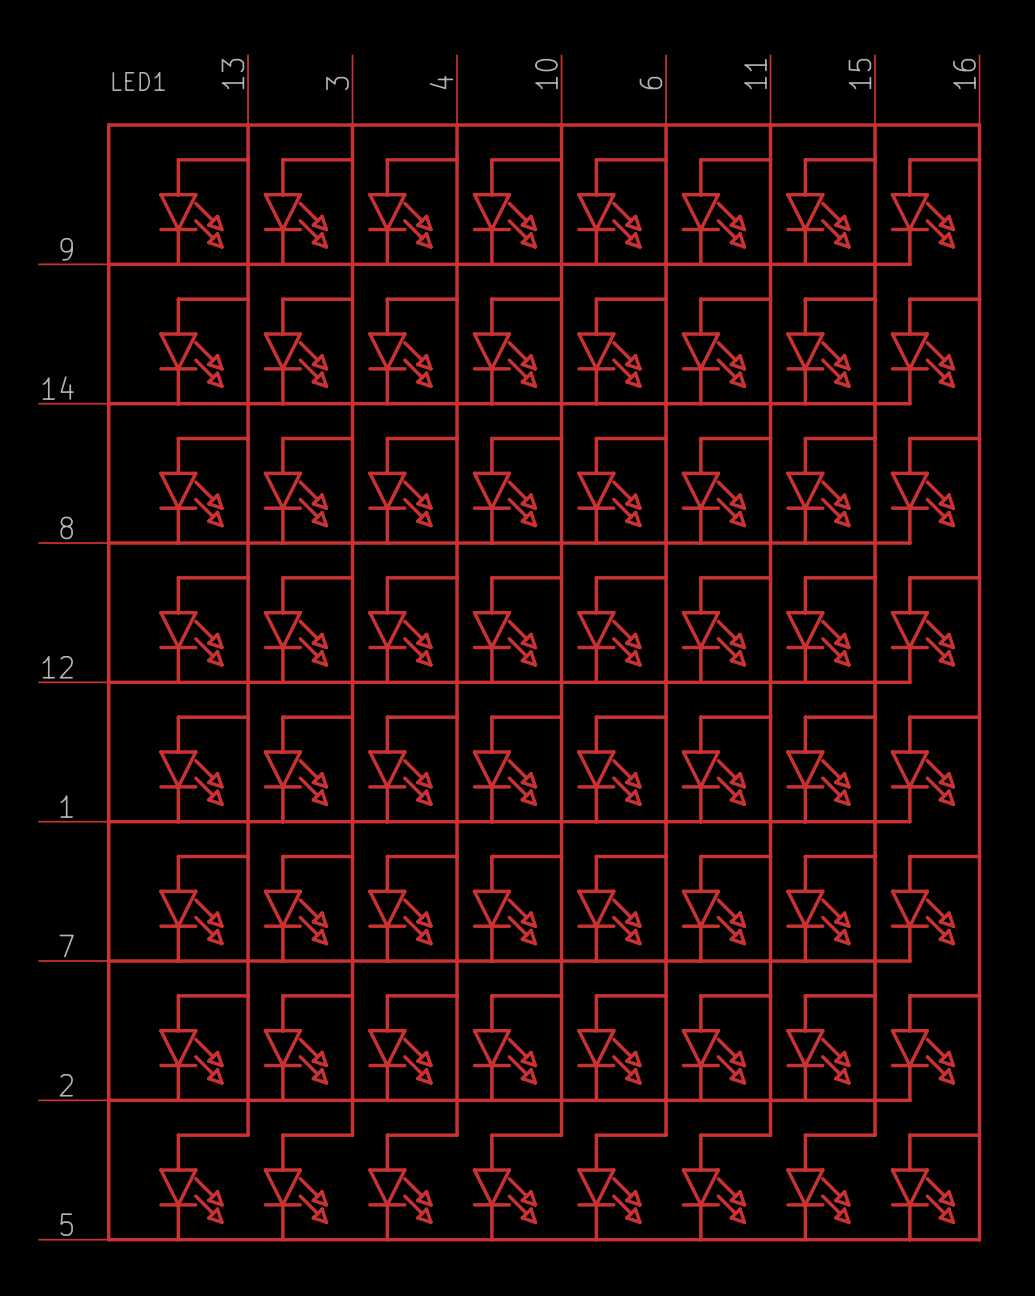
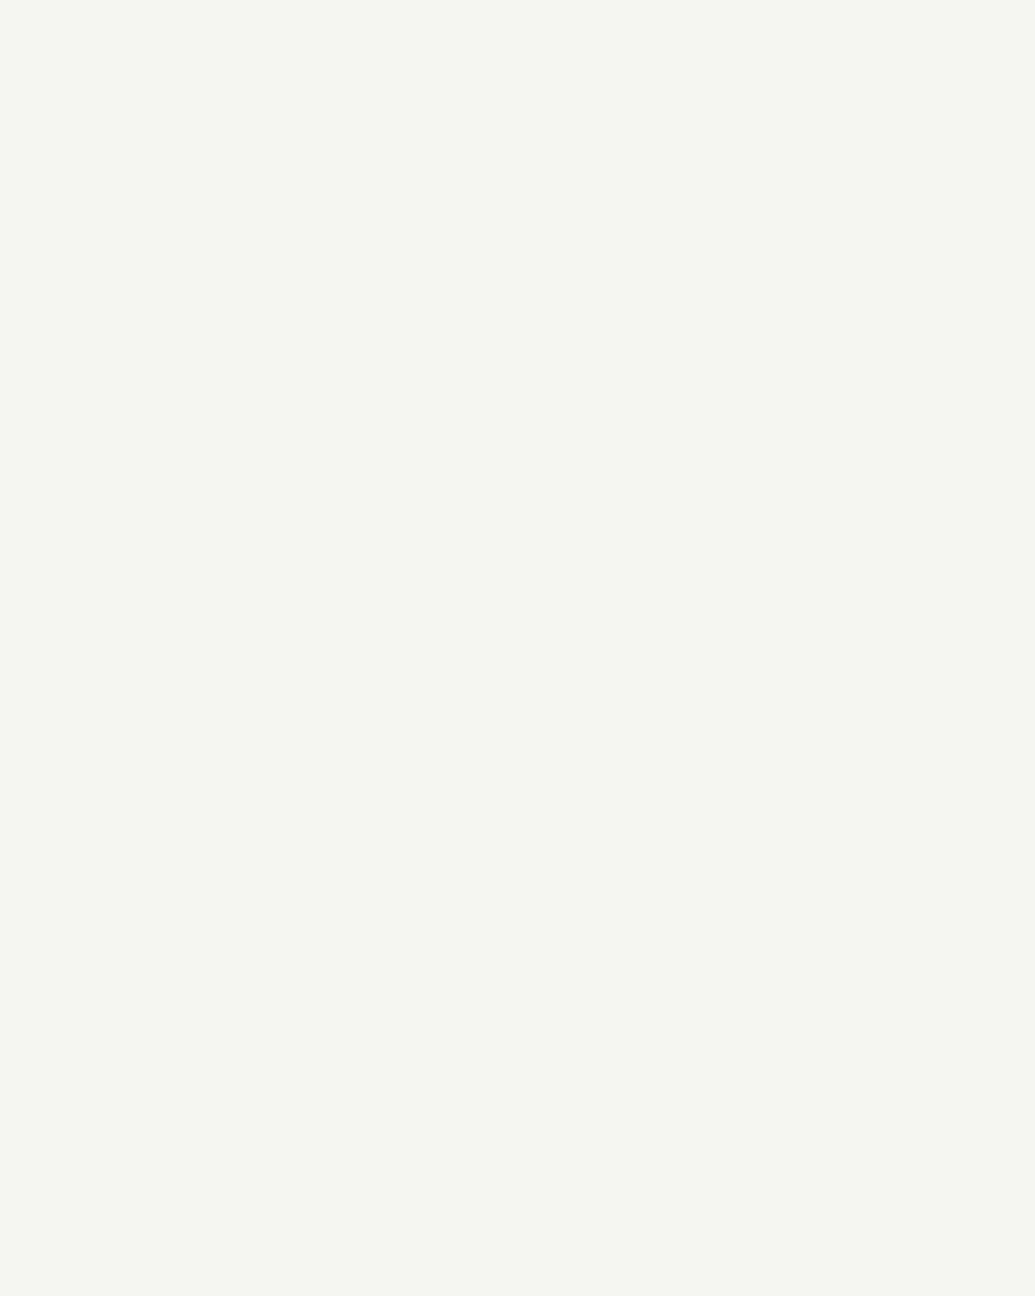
LED1: (510, 648) -> none

